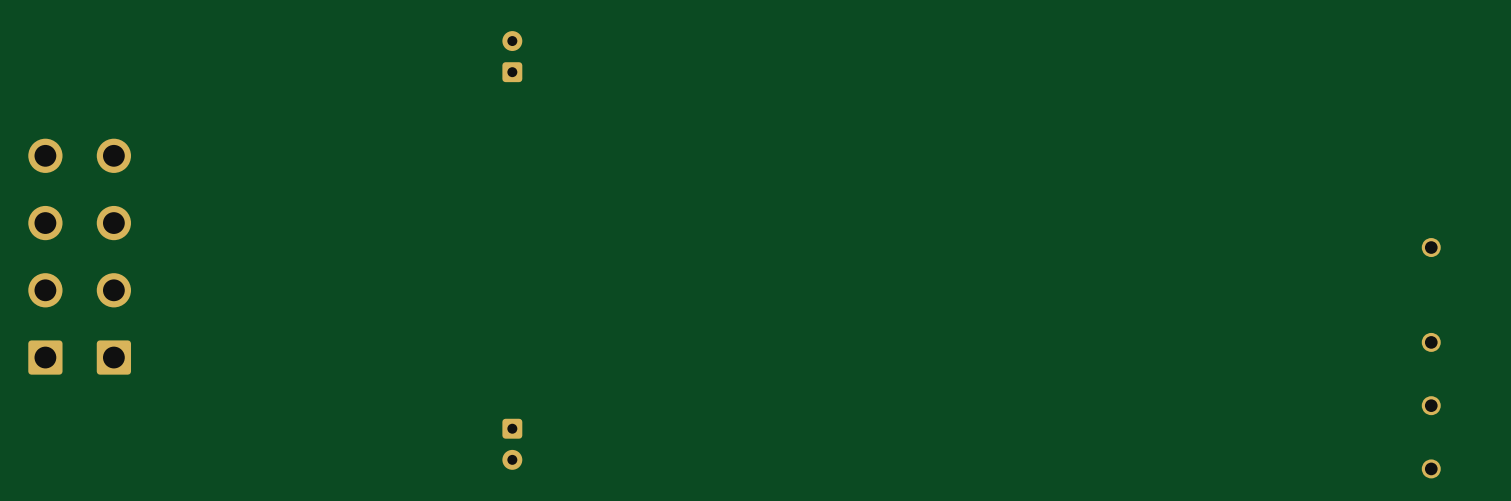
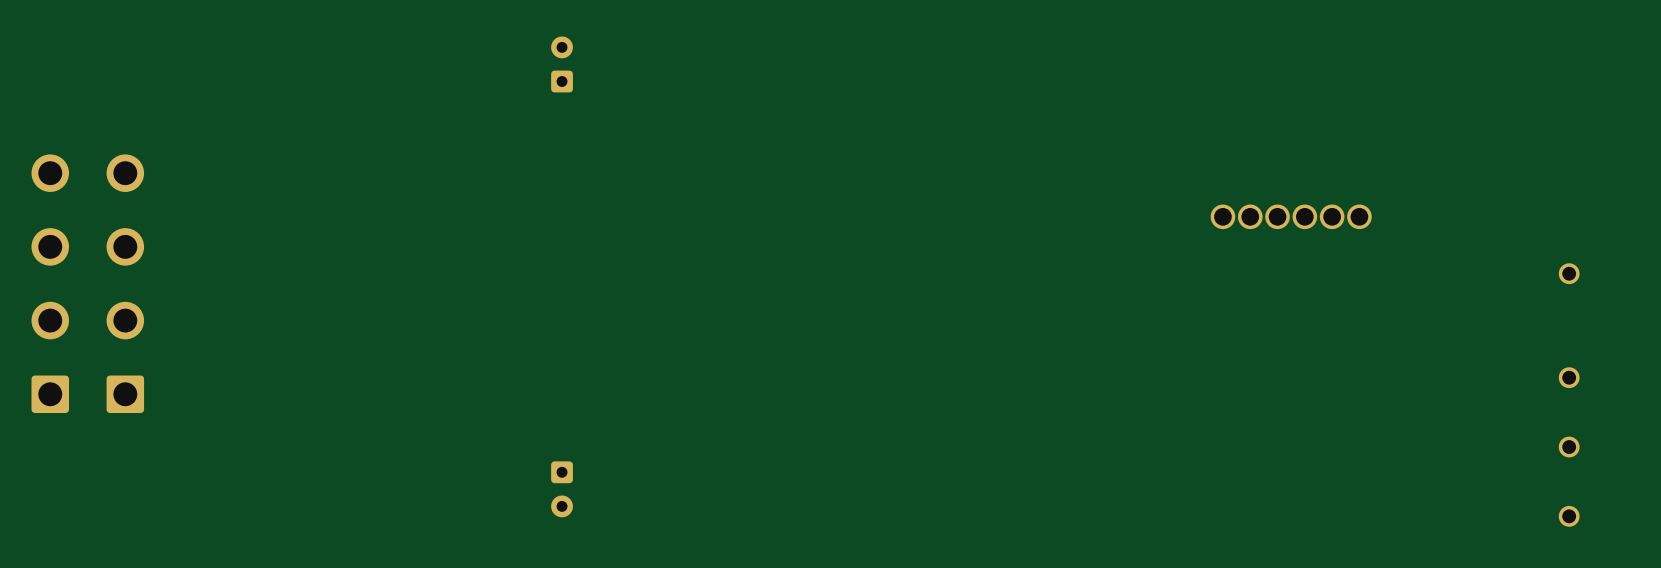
part: none -> (1291, 216)

